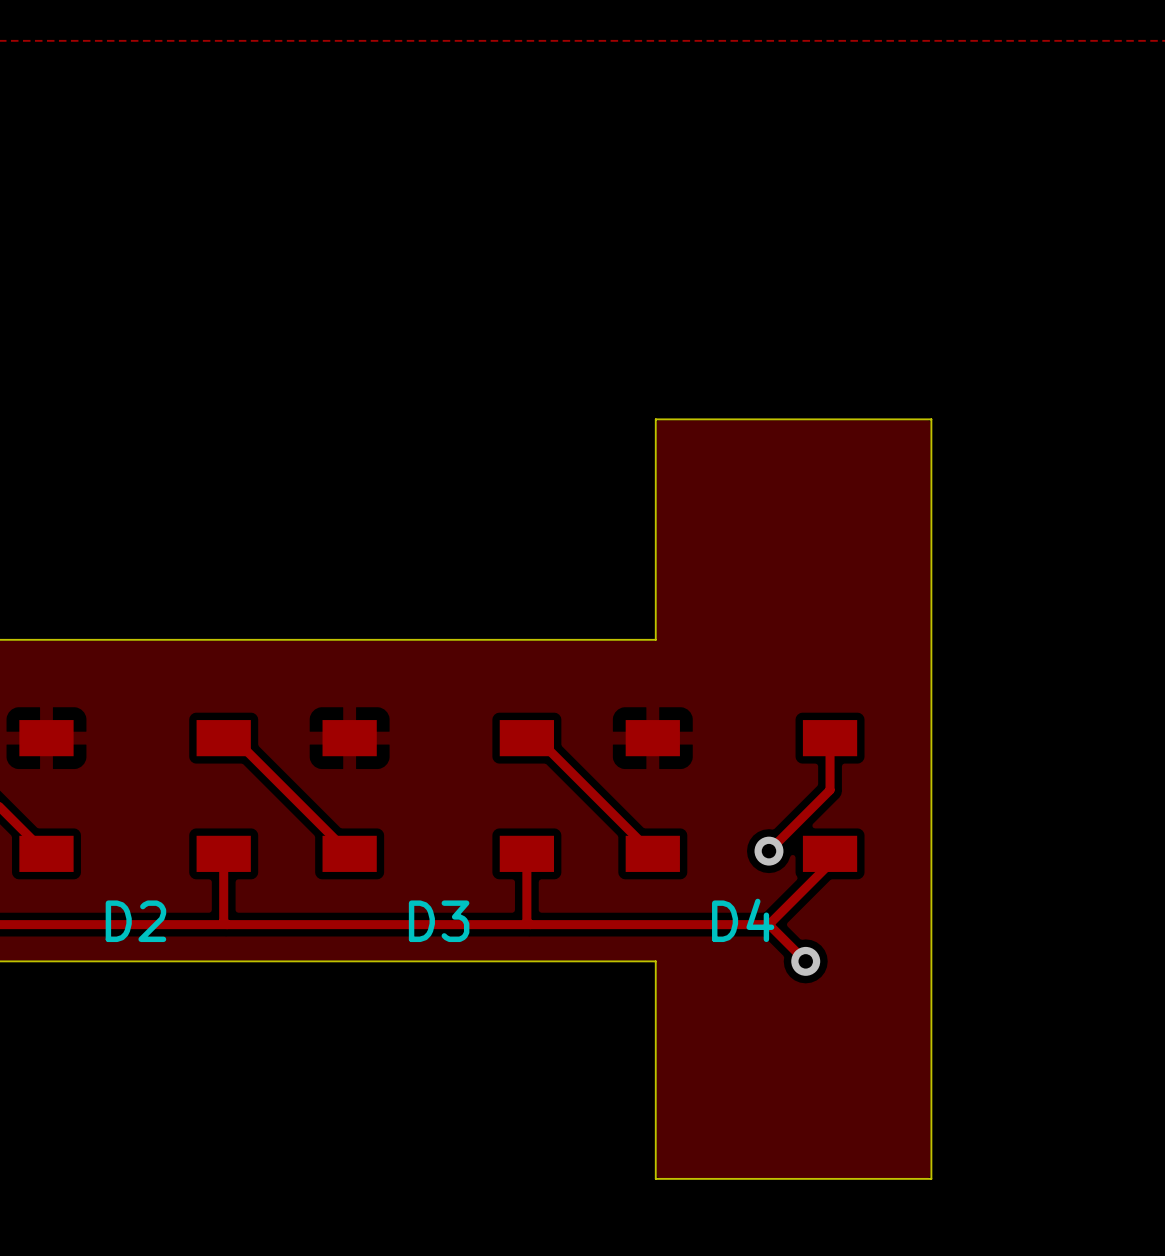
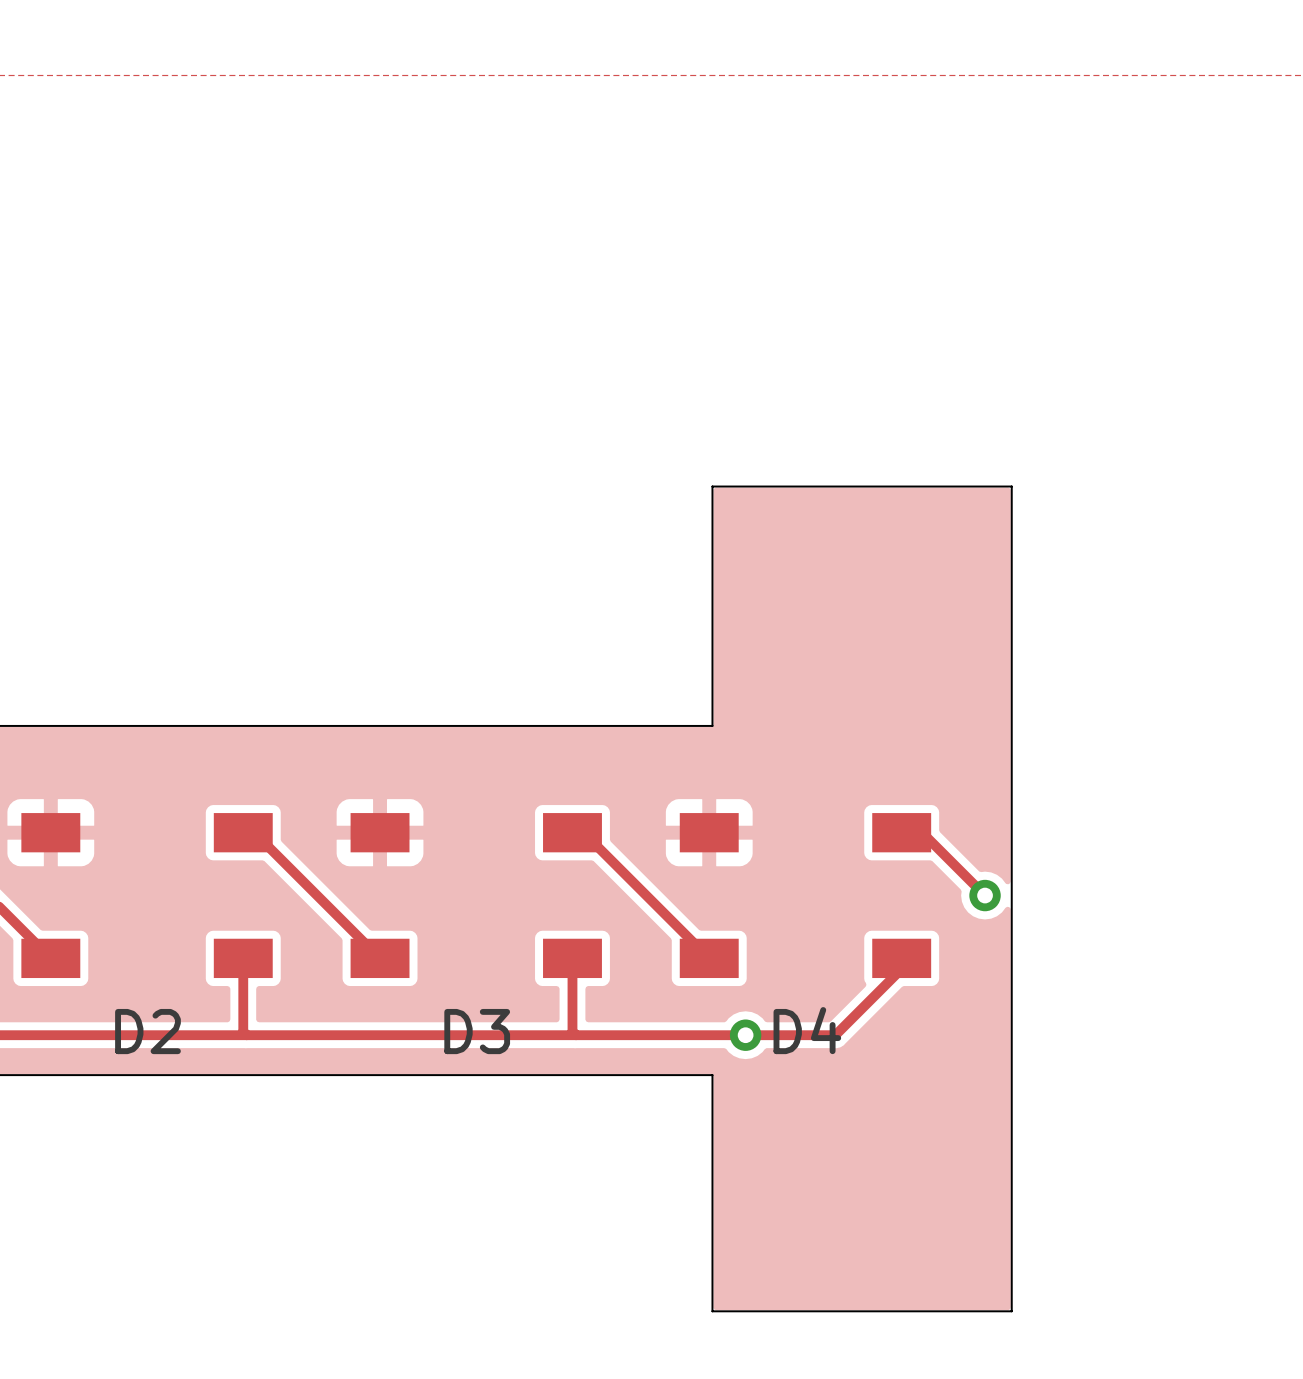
track: (830, 738) (830, 790) (768, 851) -> (901, 832) (922, 832) (985, 895)
via: none -> (985, 895)
via: (768, 851) -> none
via: none -> (745, 1035)
track: (768, 924) (805, 961) -> none
via: (805, 961) -> none

